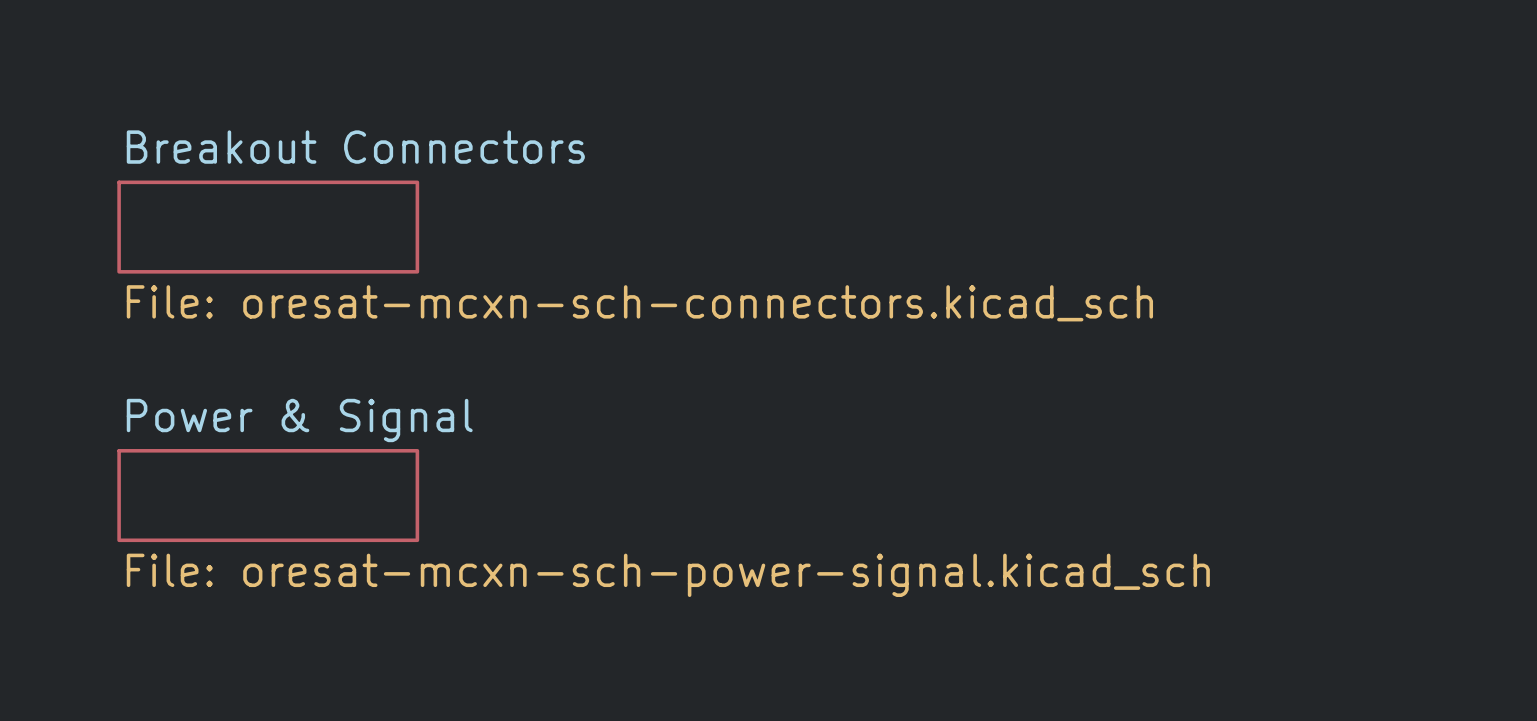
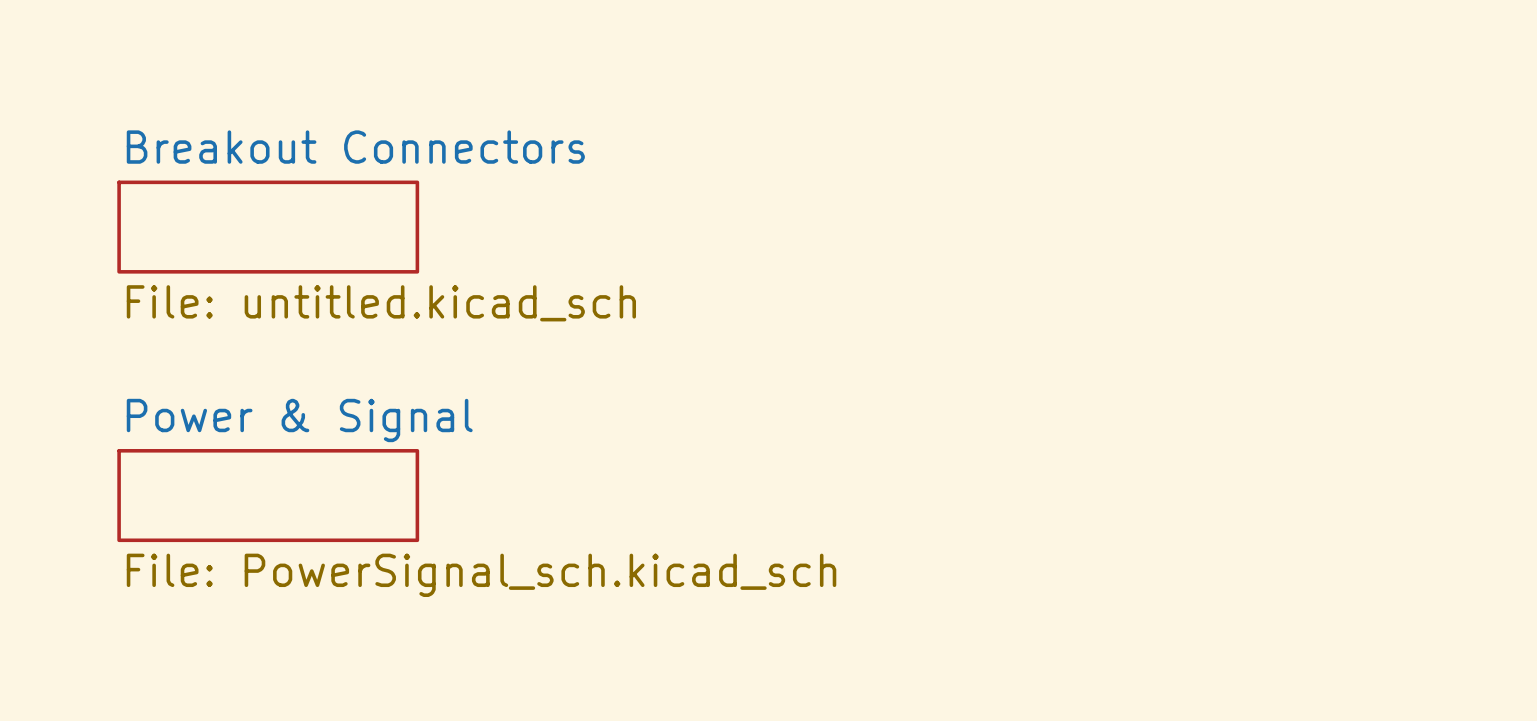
sheet Breakout Connectors value: File: oresat-mcxn-sch-connectors.kicad_sch (639, 303) -> File: untitled.kicad_sch (381, 303)
sheet Power & Signal value: File: oresat-mcxn-sch-power-signal.kicad_sch (668, 575) -> File: PowerSignal_sch.kicad_sch (481, 575)

